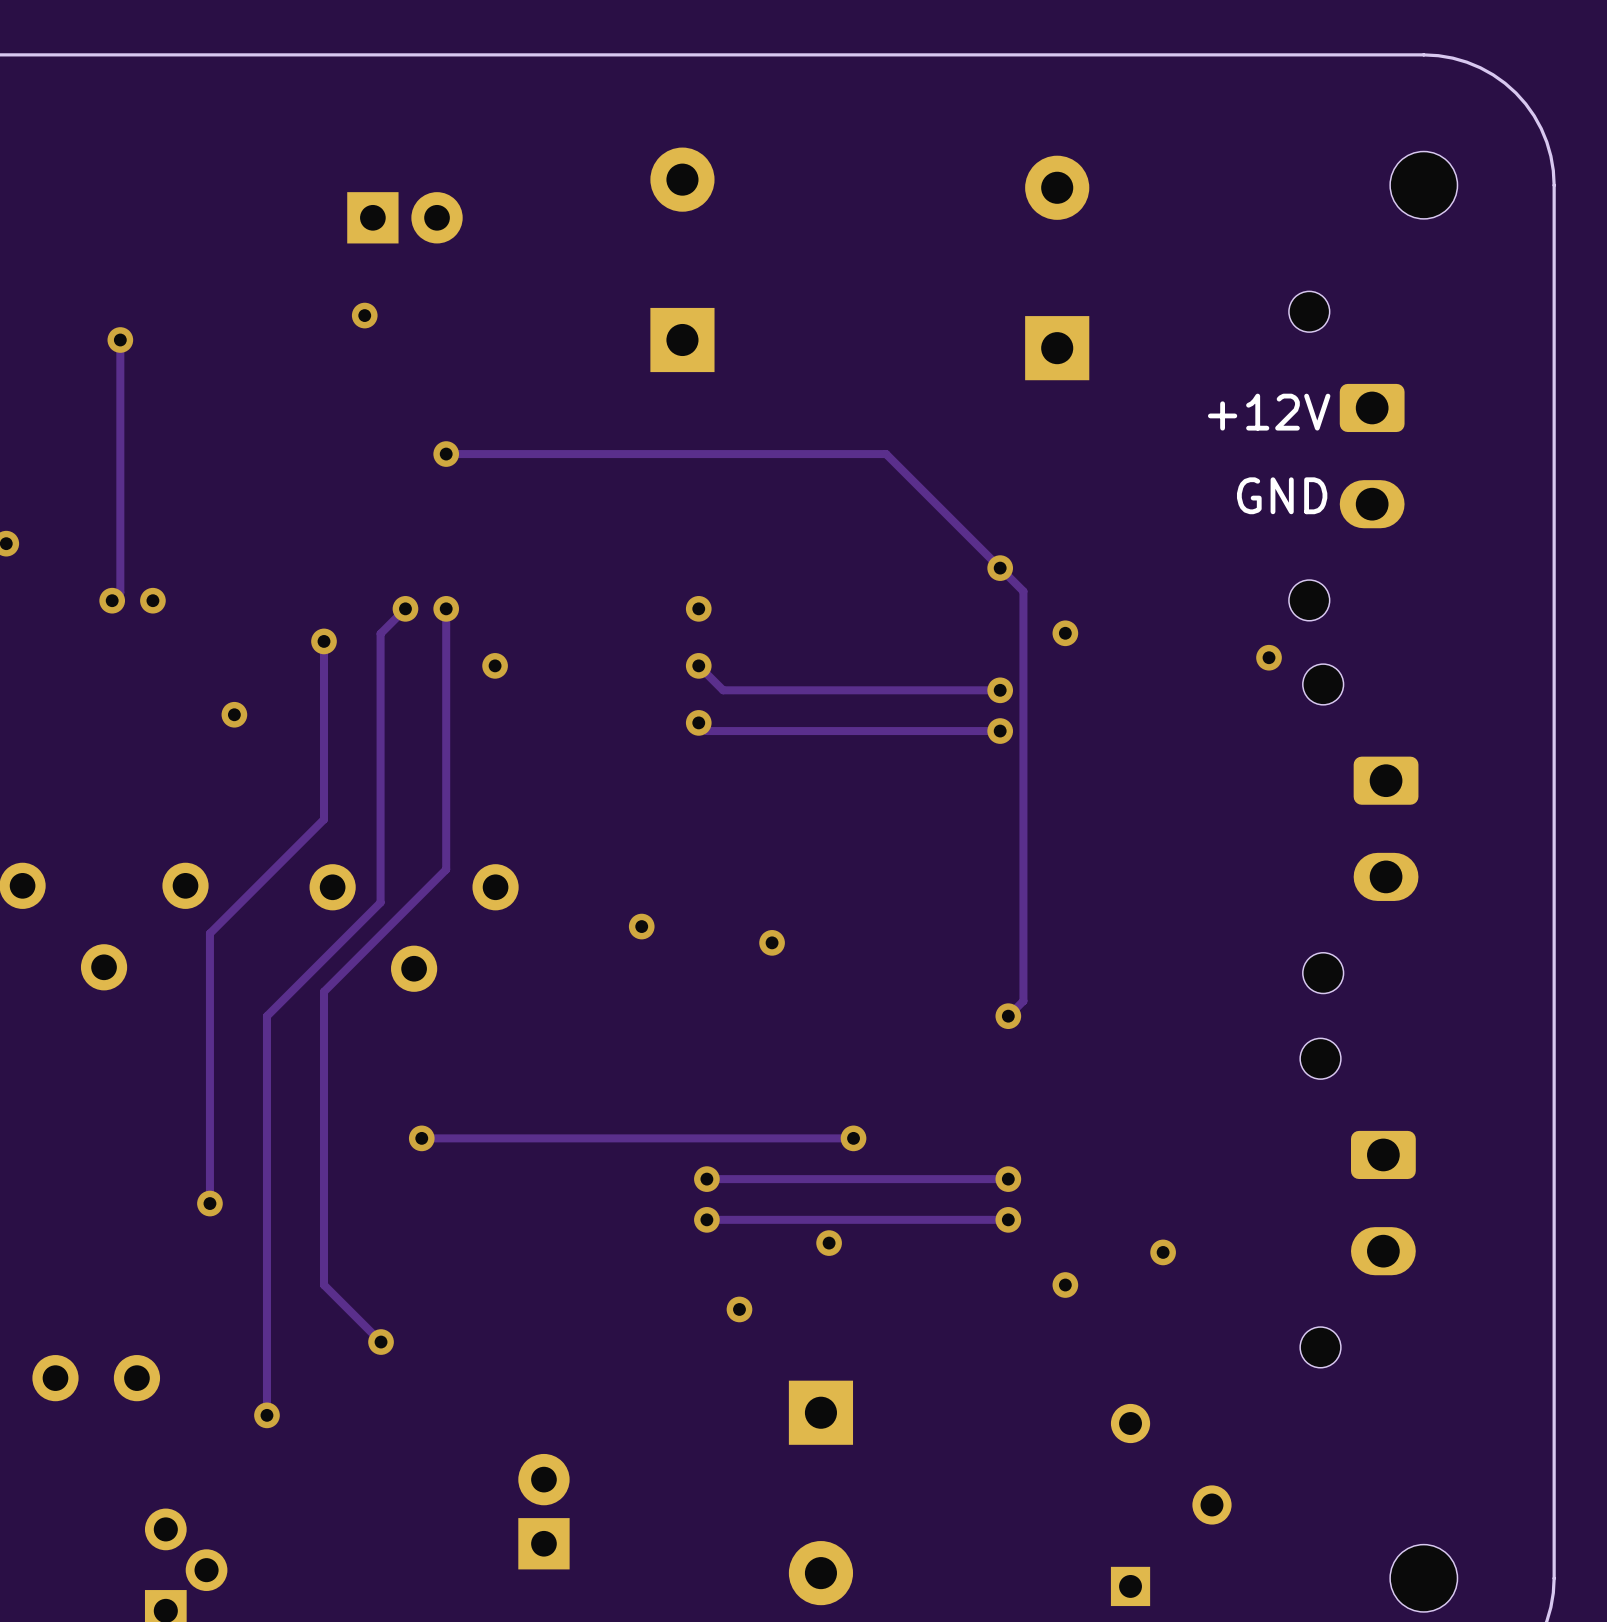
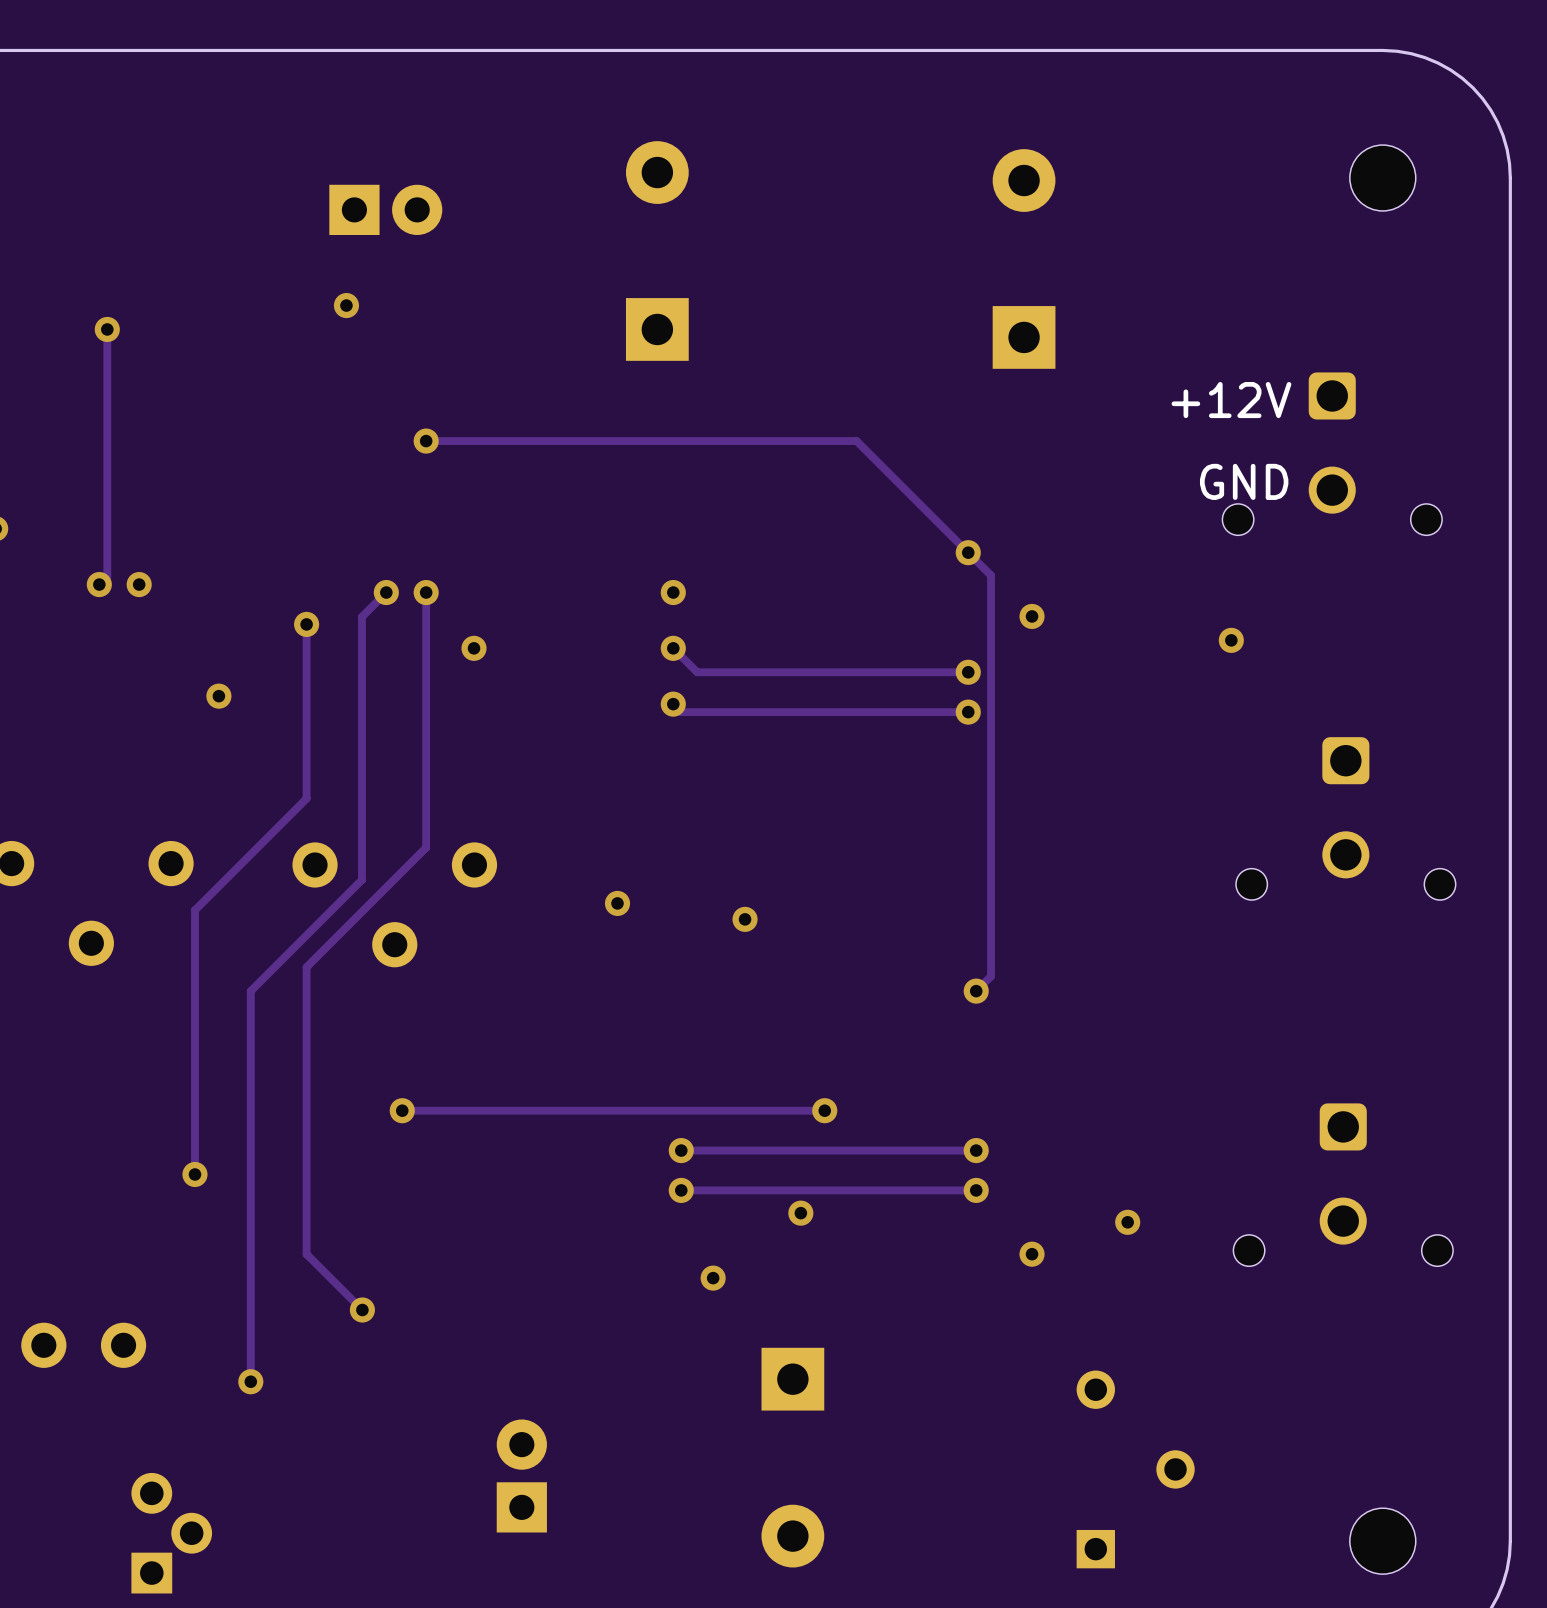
part footprint: [1288, 291, 1405, 621] -> [1222, 372, 1443, 536]
part footprint: [1302, 664, 1419, 994] -> [1236, 737, 1456, 901]
part footprint: [1300, 1038, 1416, 1368] -> [1233, 1103, 1454, 1267]

